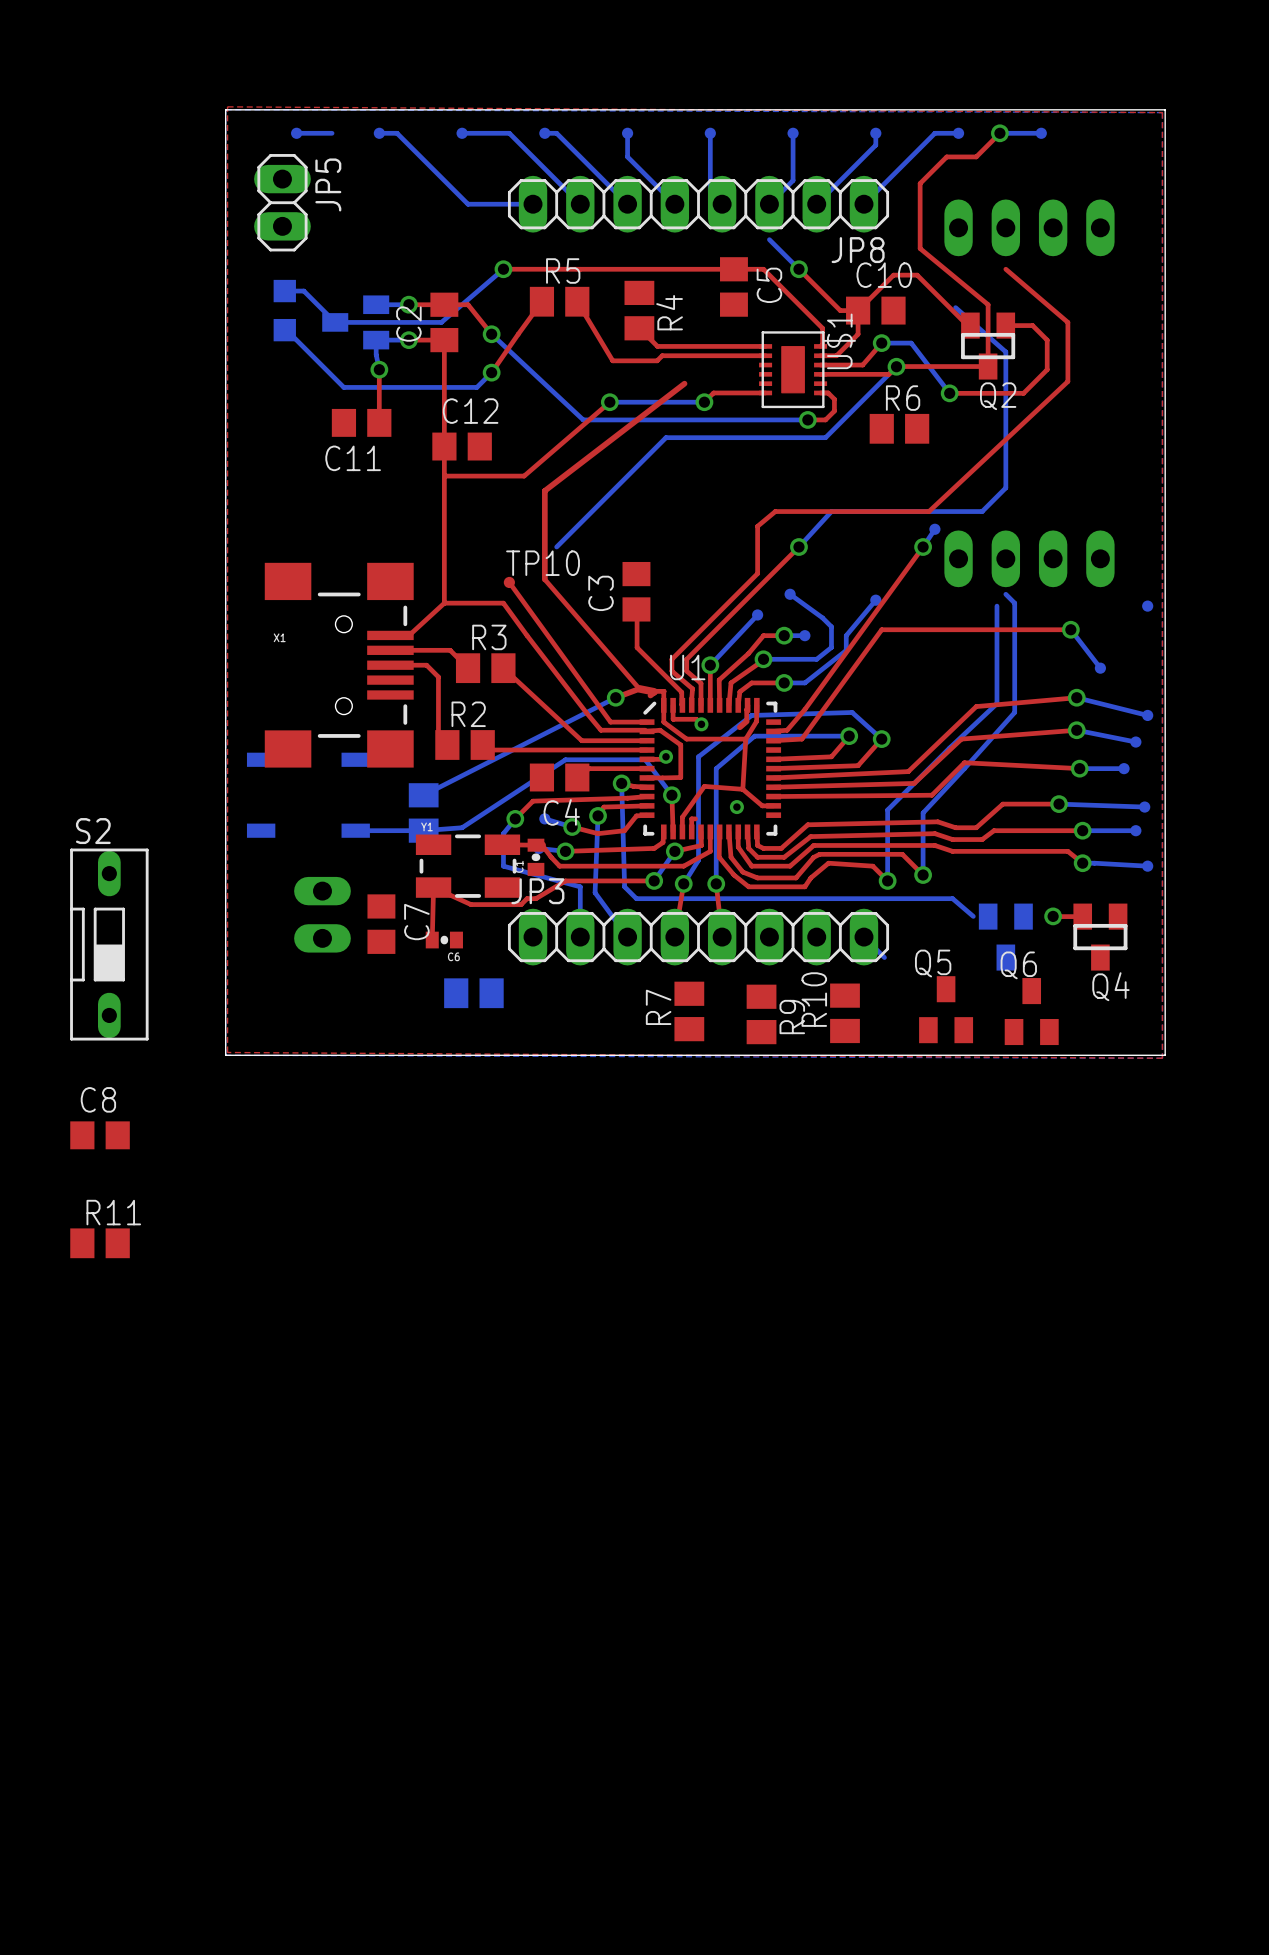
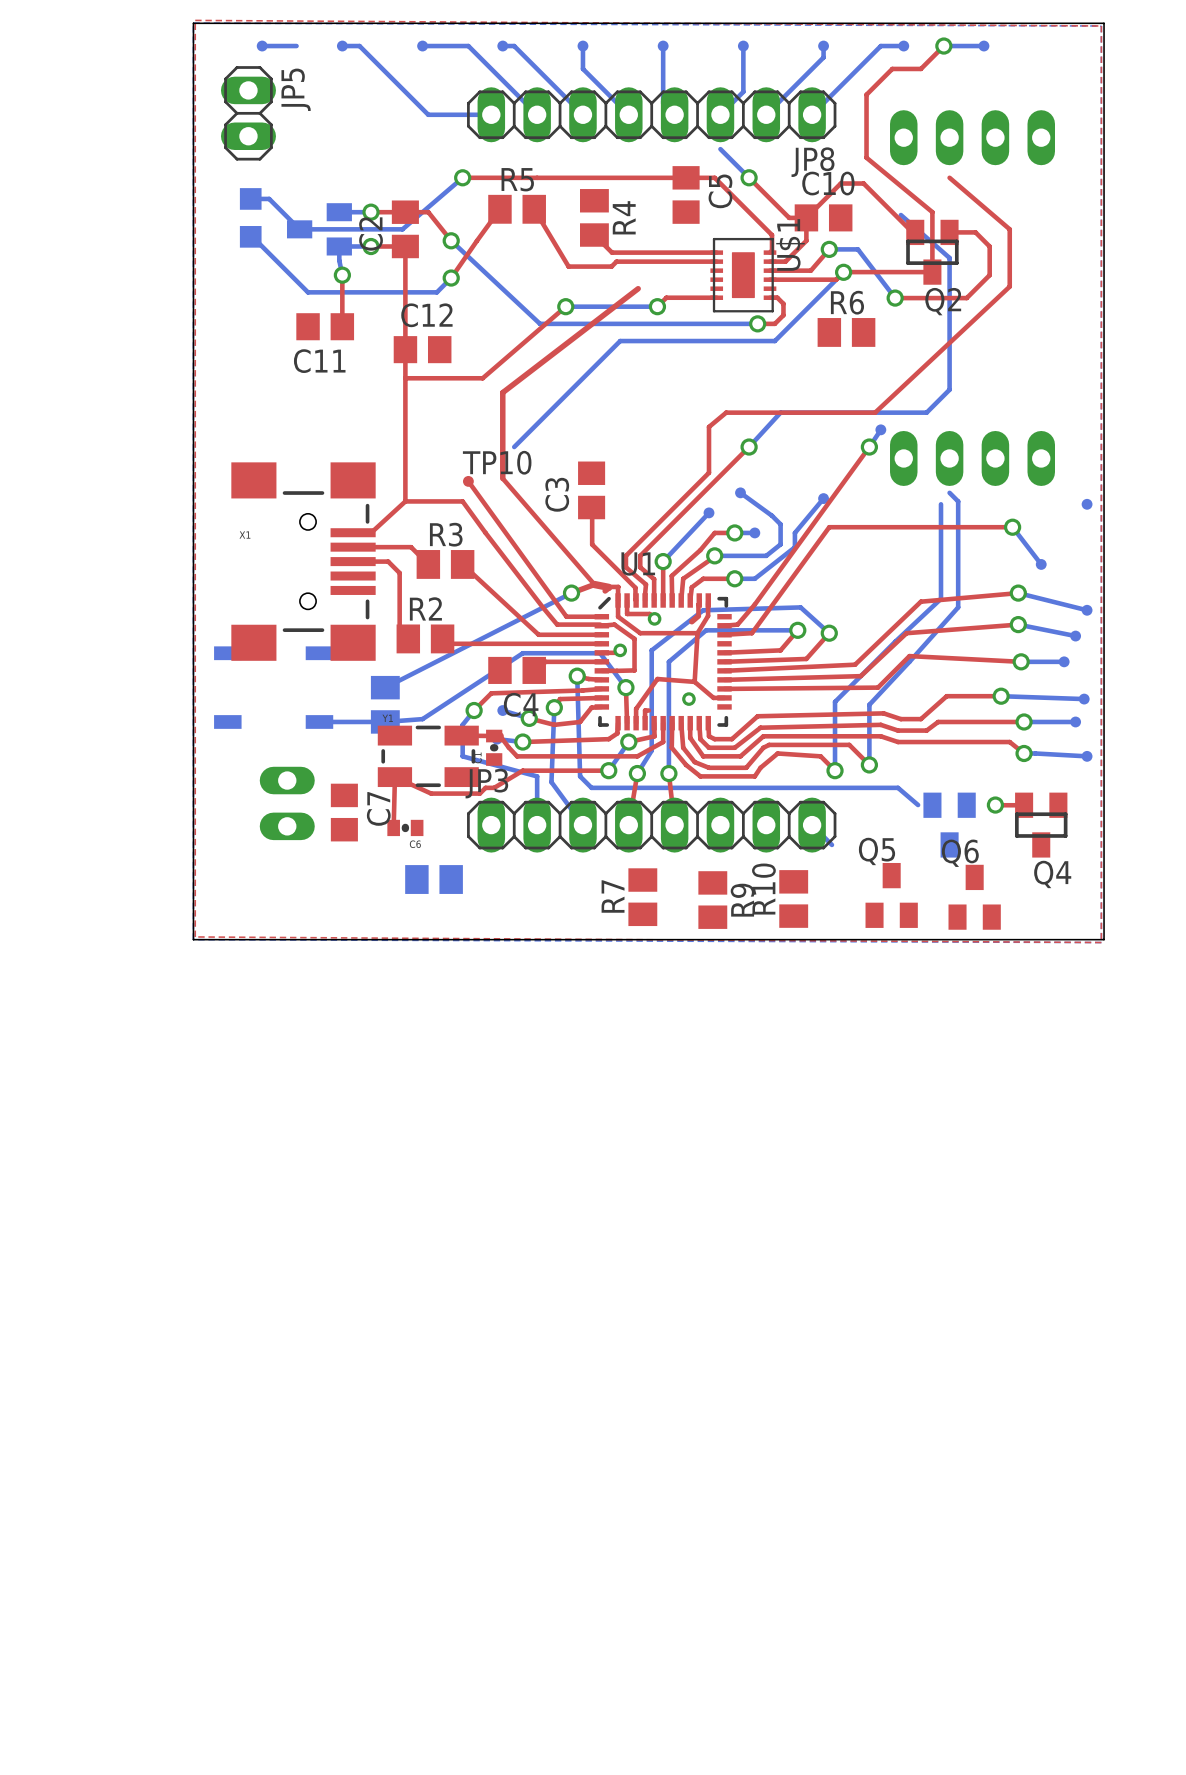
S2: (109, 944) -> none
C8: (100, 1135) -> none
R11: (100, 1243) -> none

